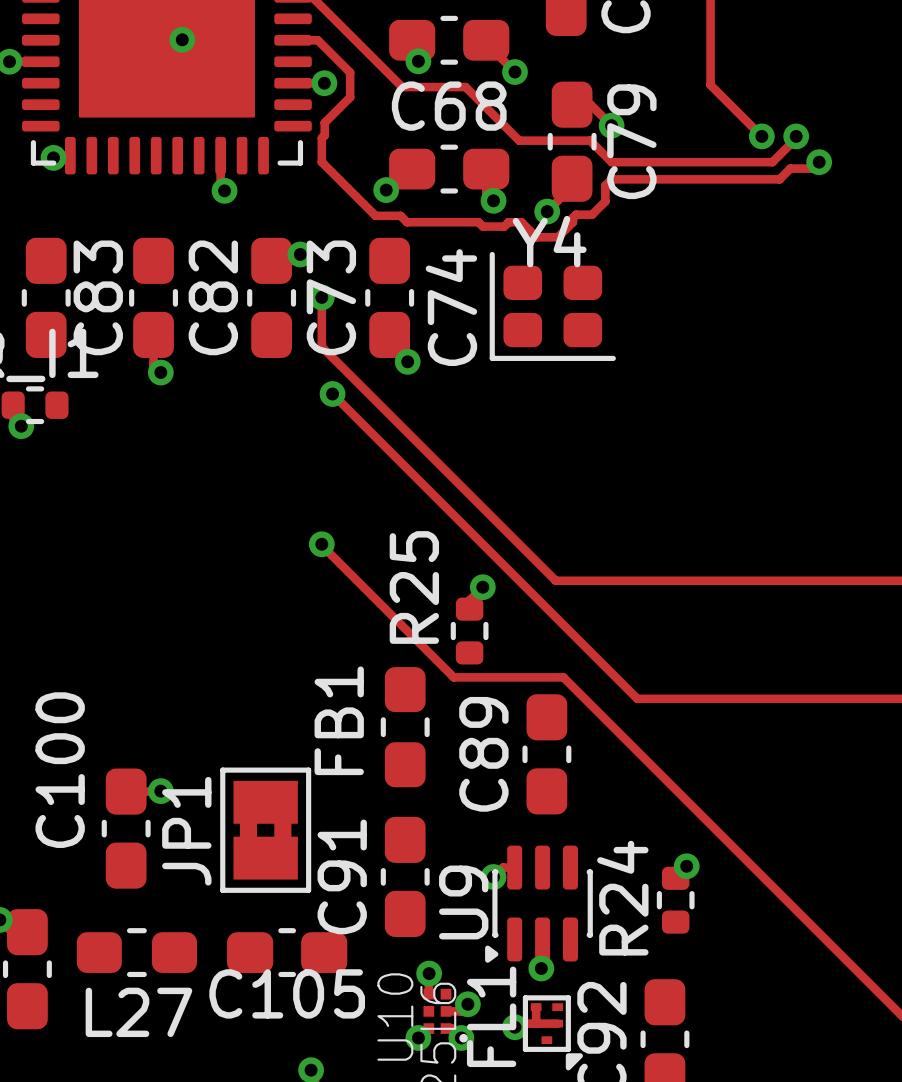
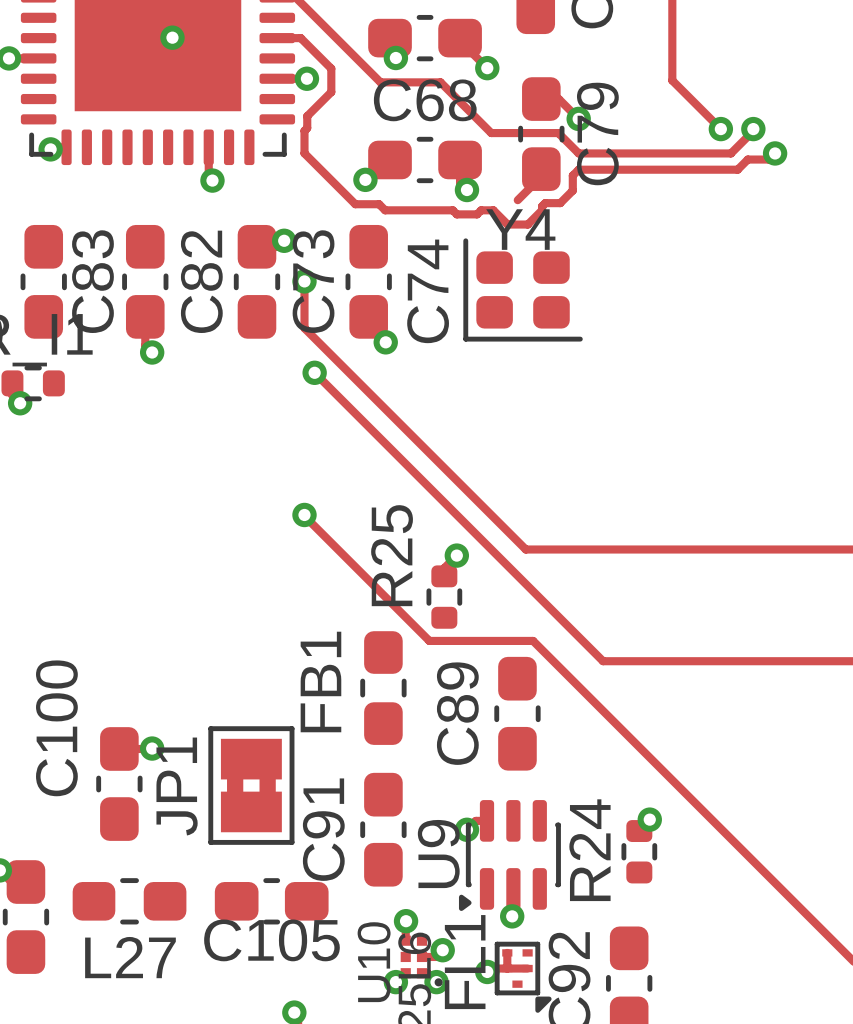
via: (547, 211) -> none

